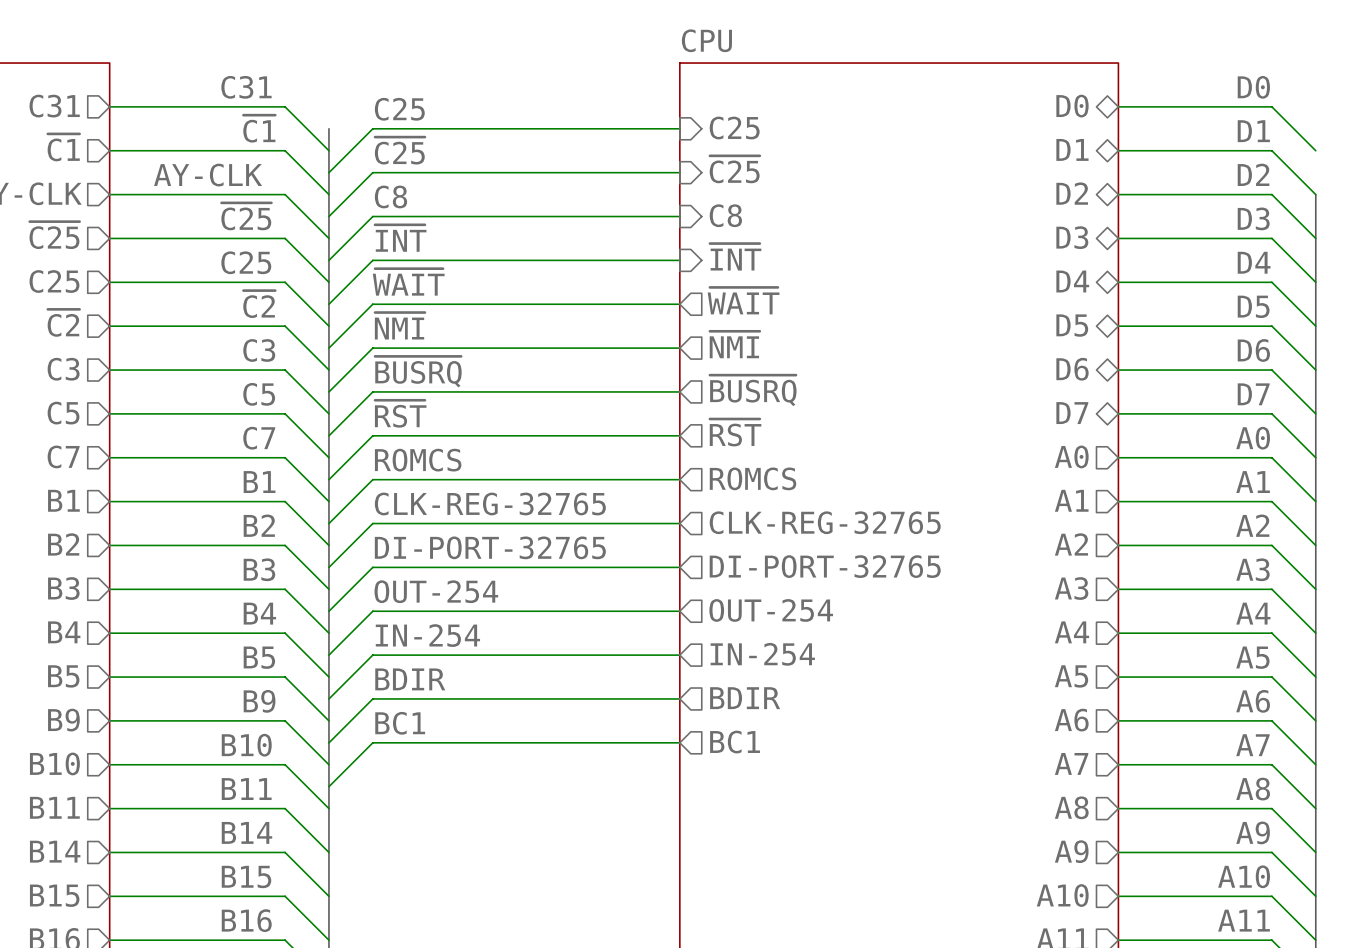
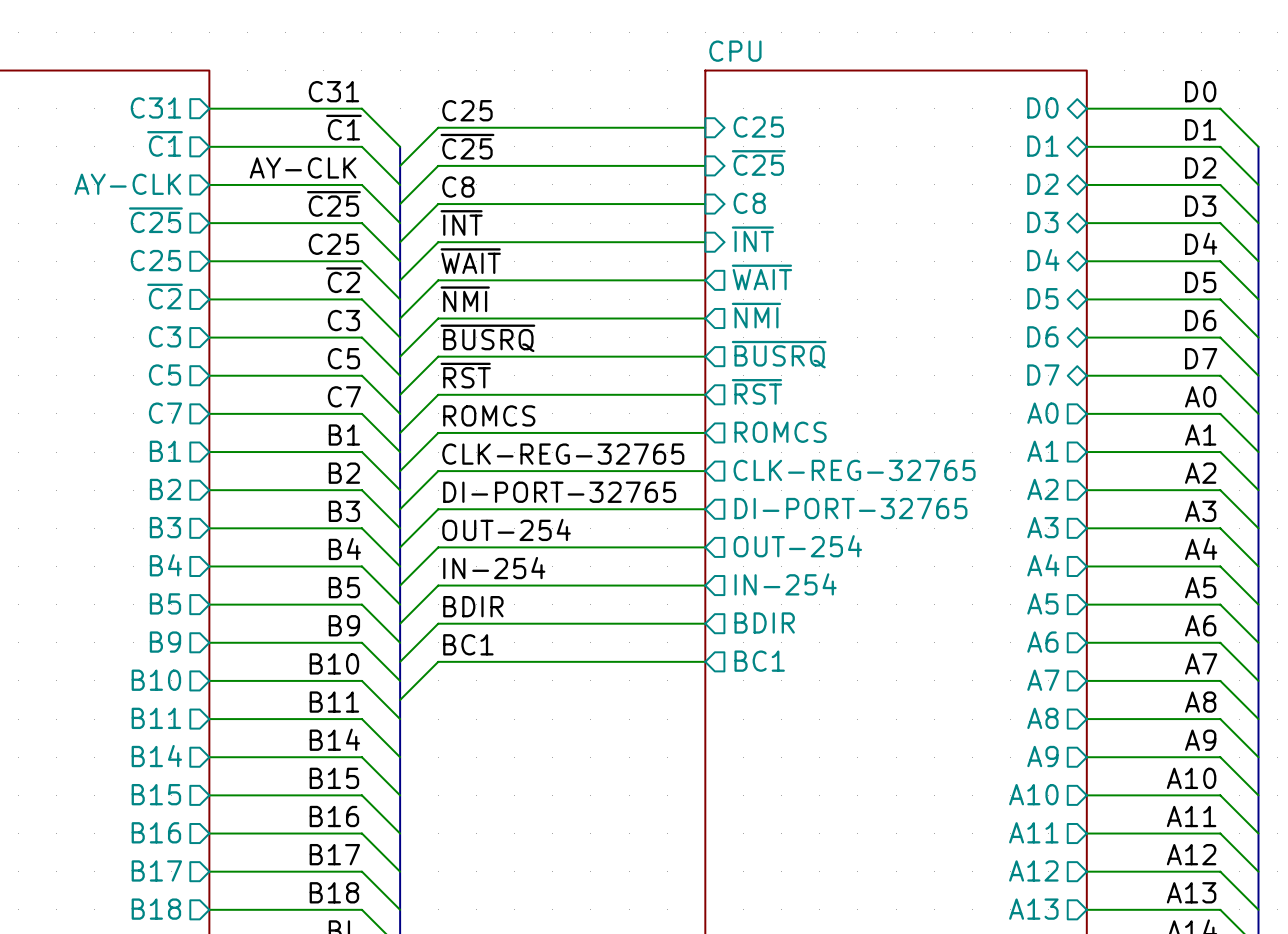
bus: (328, 128) (328, 150) -> none
bus: none -> (1258, 146) (1258, 184)

